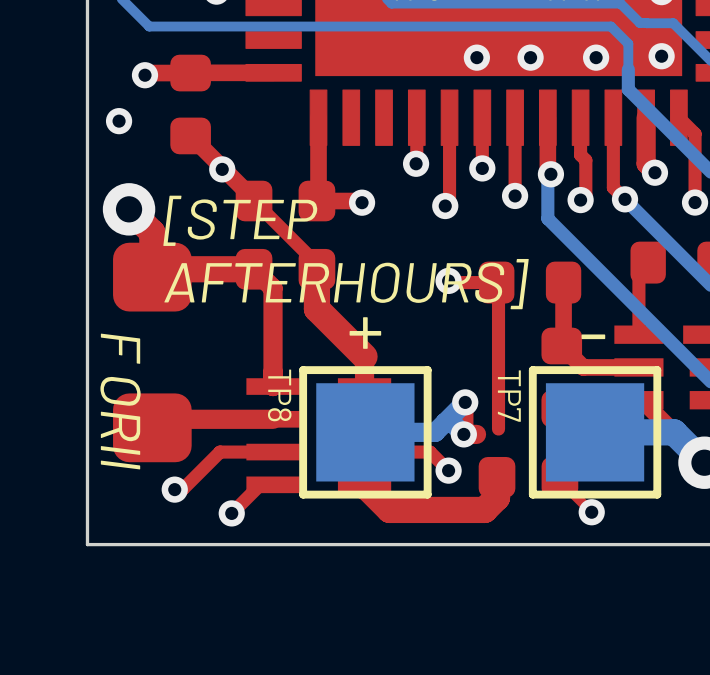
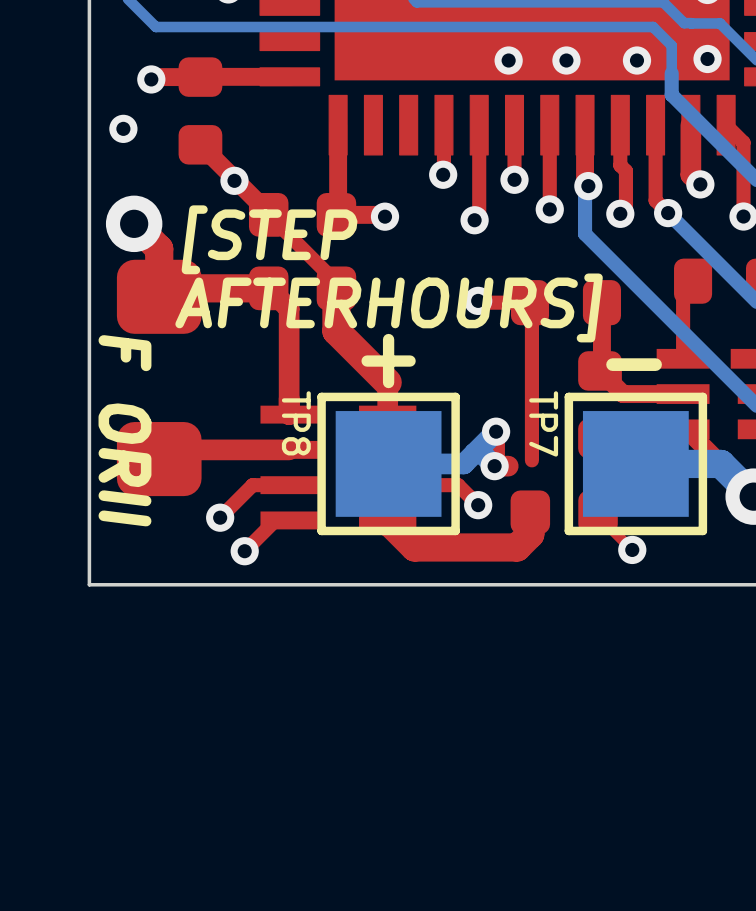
top track: (239, 452) (220, 452) (182, 489) (174, 489) -> (252, 485) (220, 517)
via position: (174, 489) -> (220, 517)

